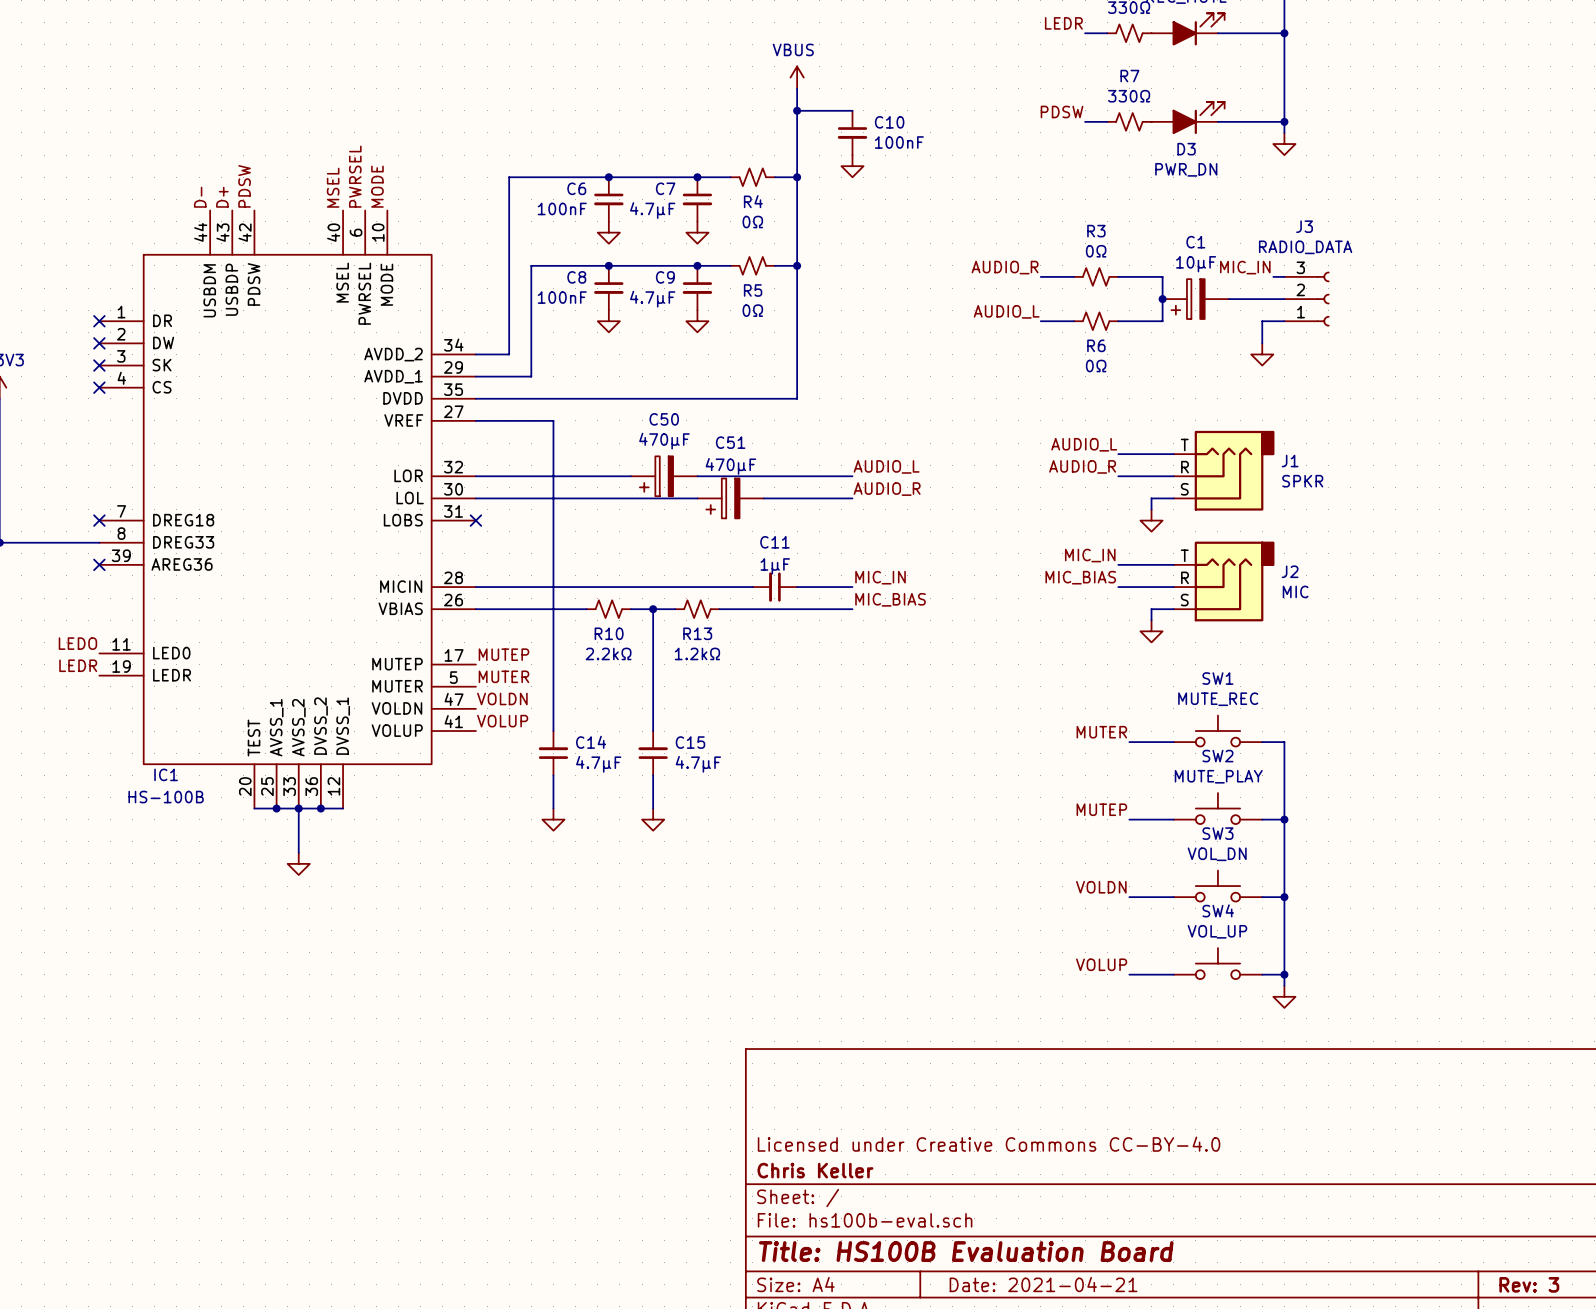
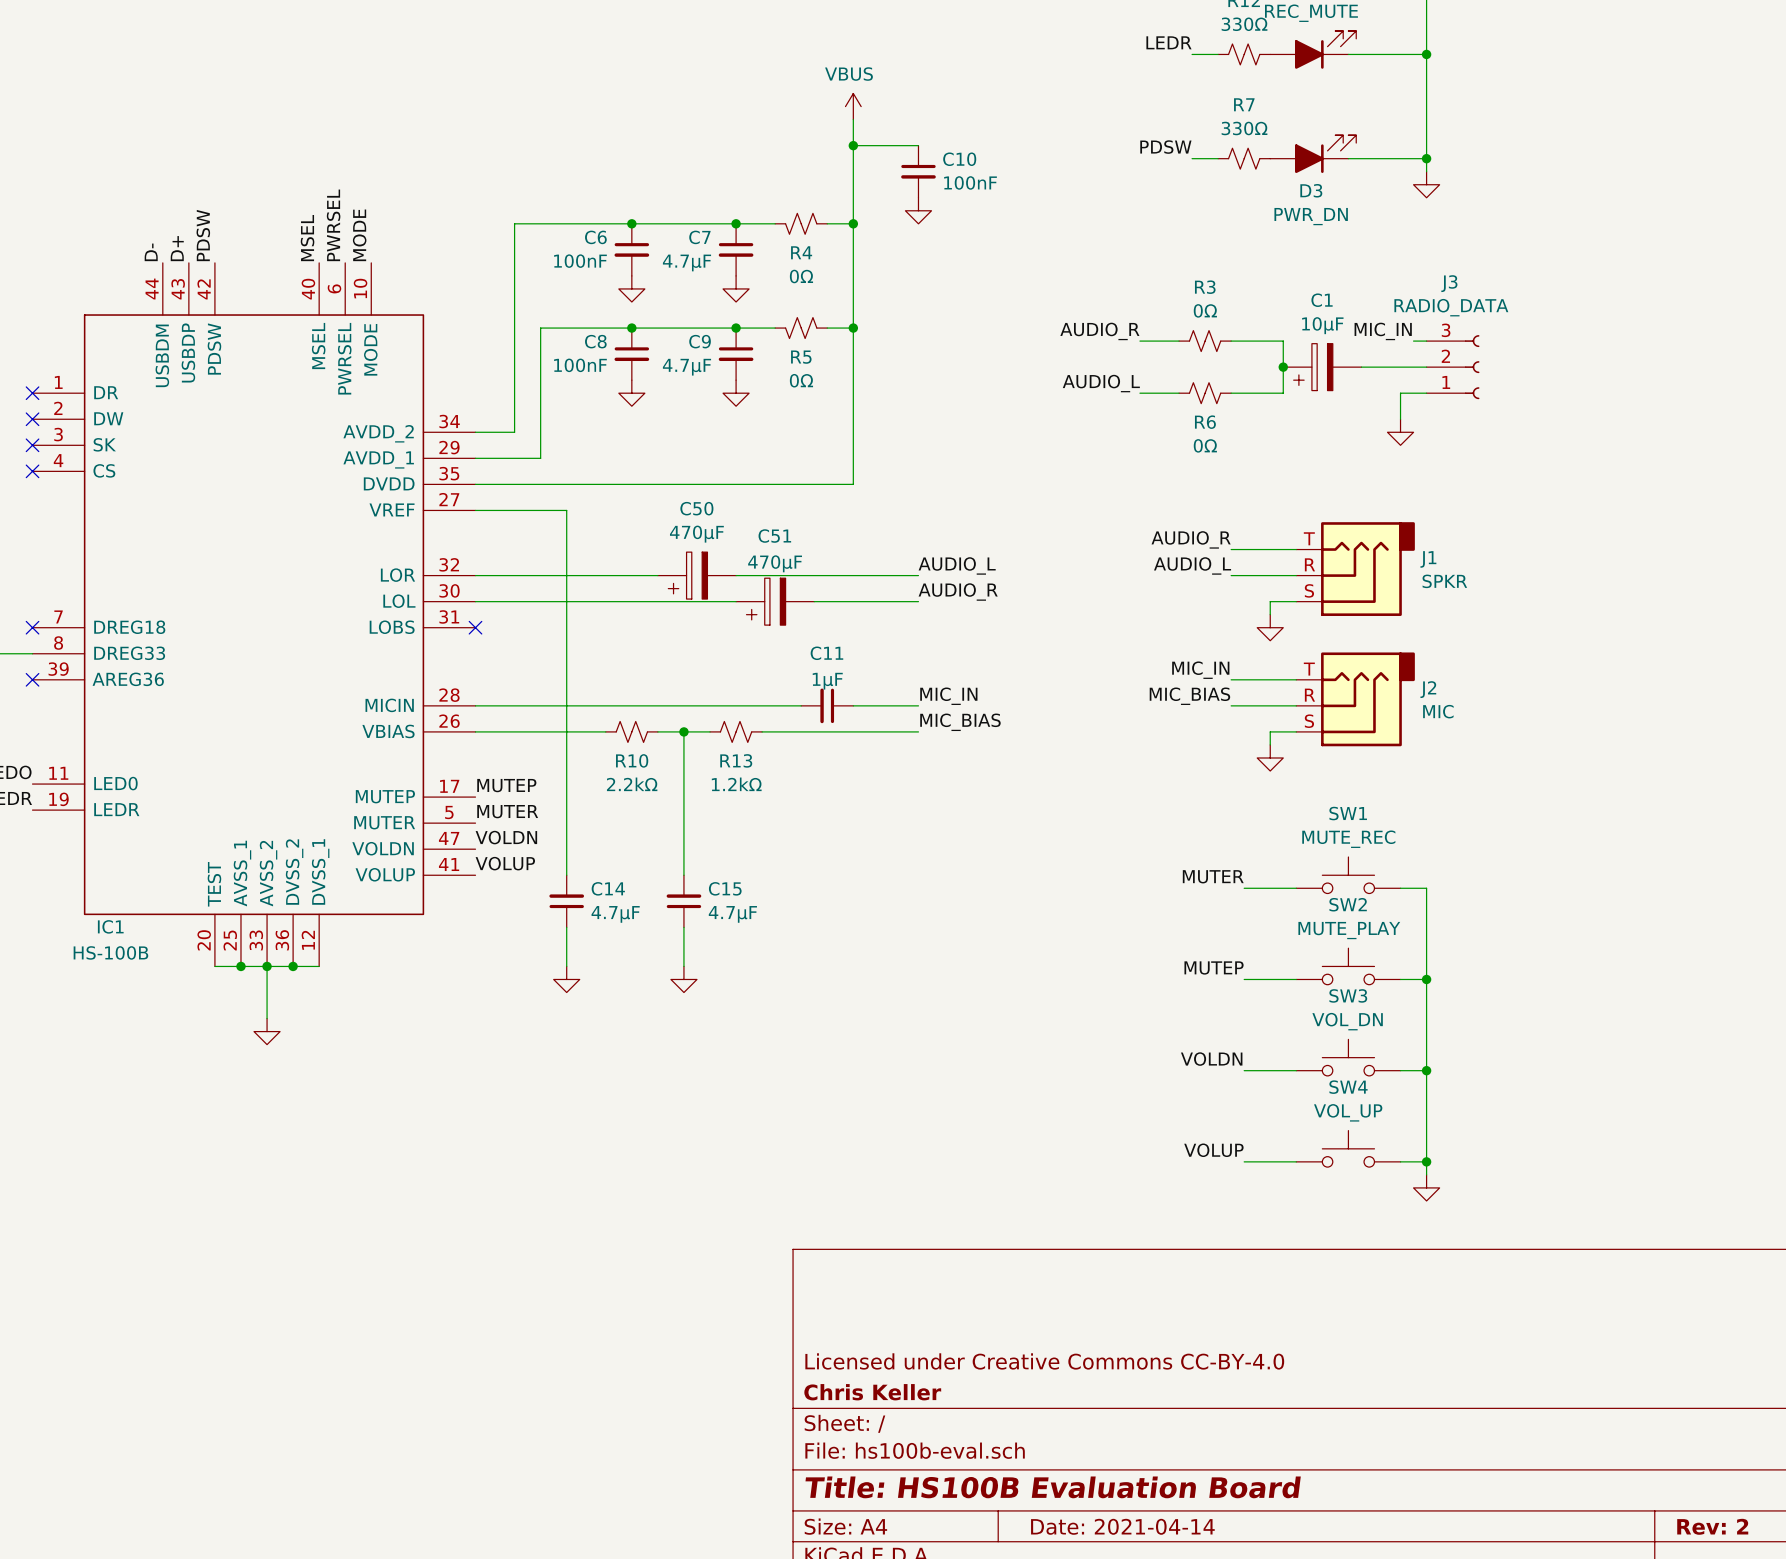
label: AUDIO_L (1084, 444) -> AUDIO_R (1191, 539)
label: AUDIO_R (1082, 466) -> AUDIO_L (1192, 565)
title block: Date: 2021-04-21 (1043, 1284) -> Date: 2021-04-14 (1122, 1526)
title block: Rev: 3 (1529, 1284) -> Rev: 2 (1712, 1526)

